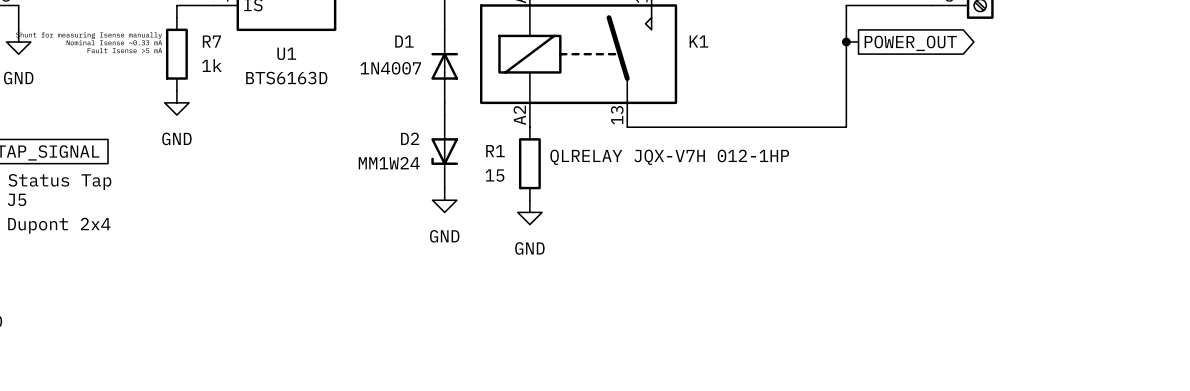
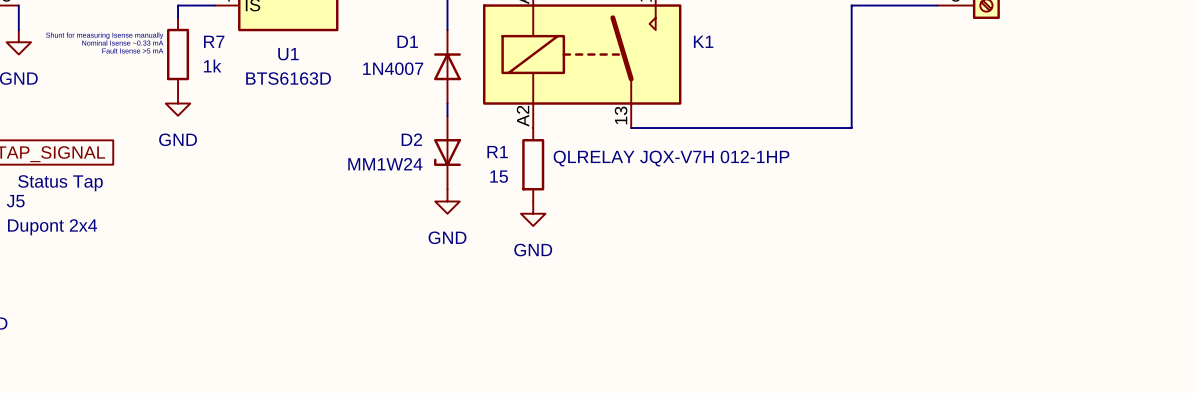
wire: (846, 42) (858, 42) -> none
junction: (846, 42) -> none
global label: POWER_OUT (910, 43) -> none

